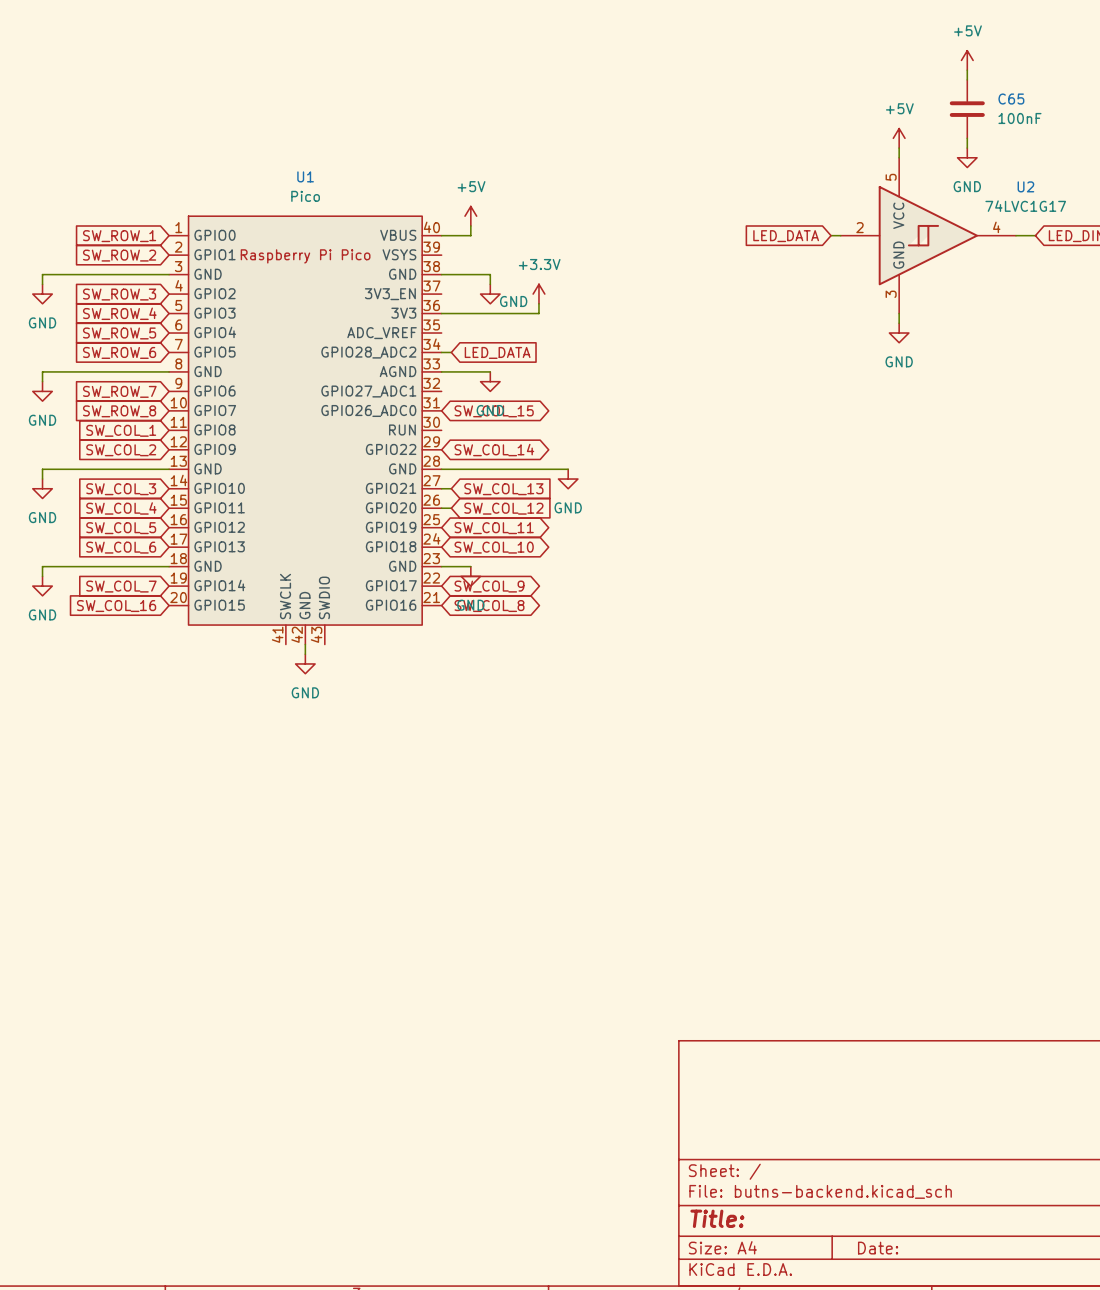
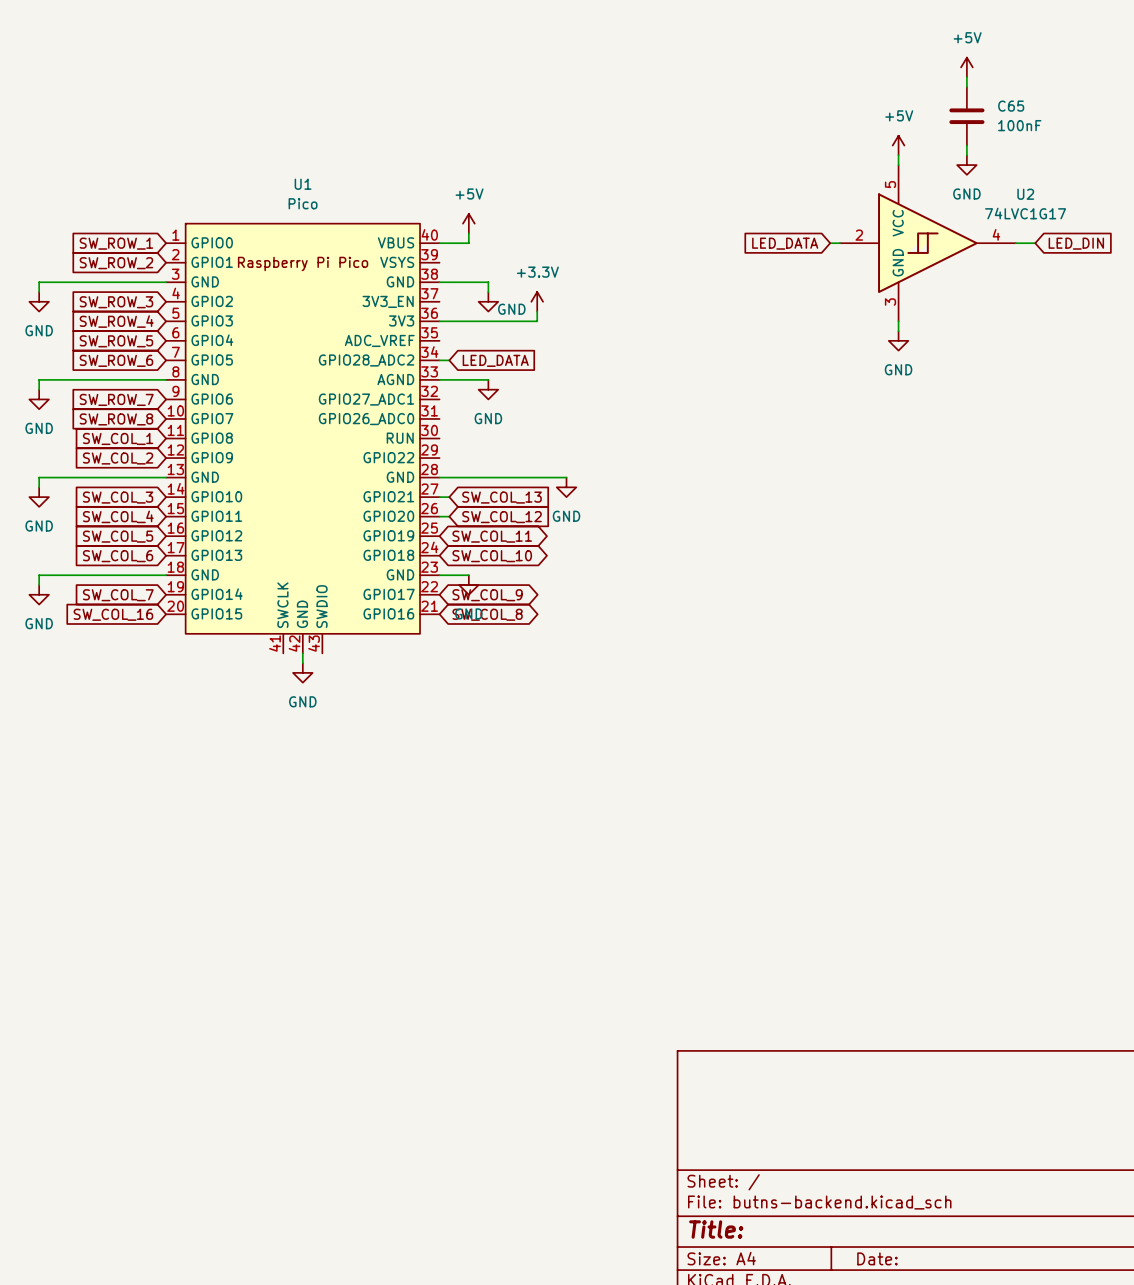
global label: SW_COL_15 (494, 411) -> none
global label: SW_COL_14 (494, 450) -> none

